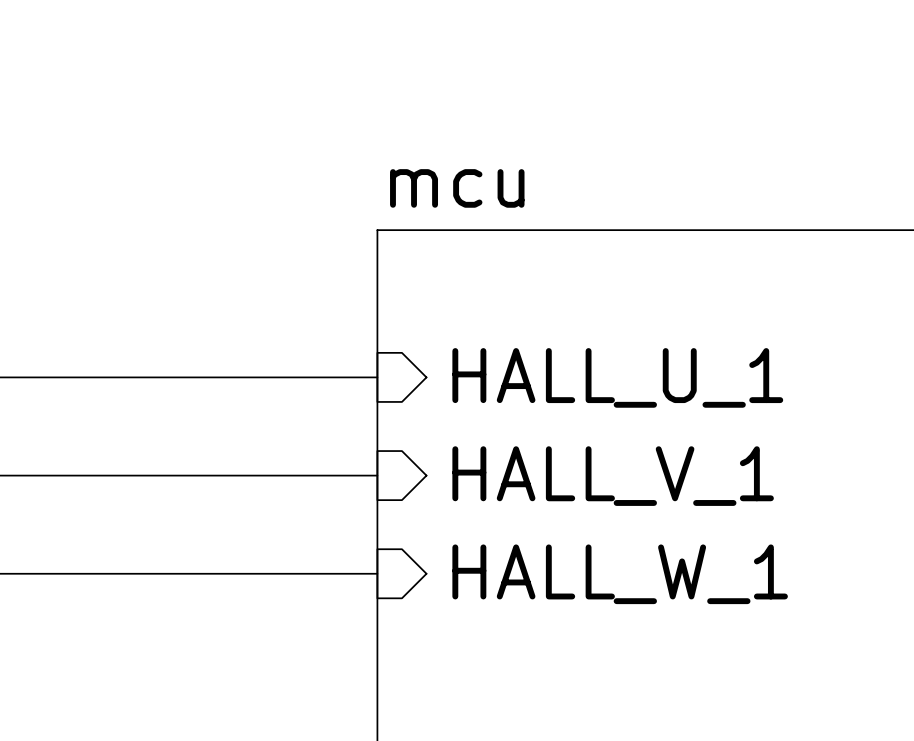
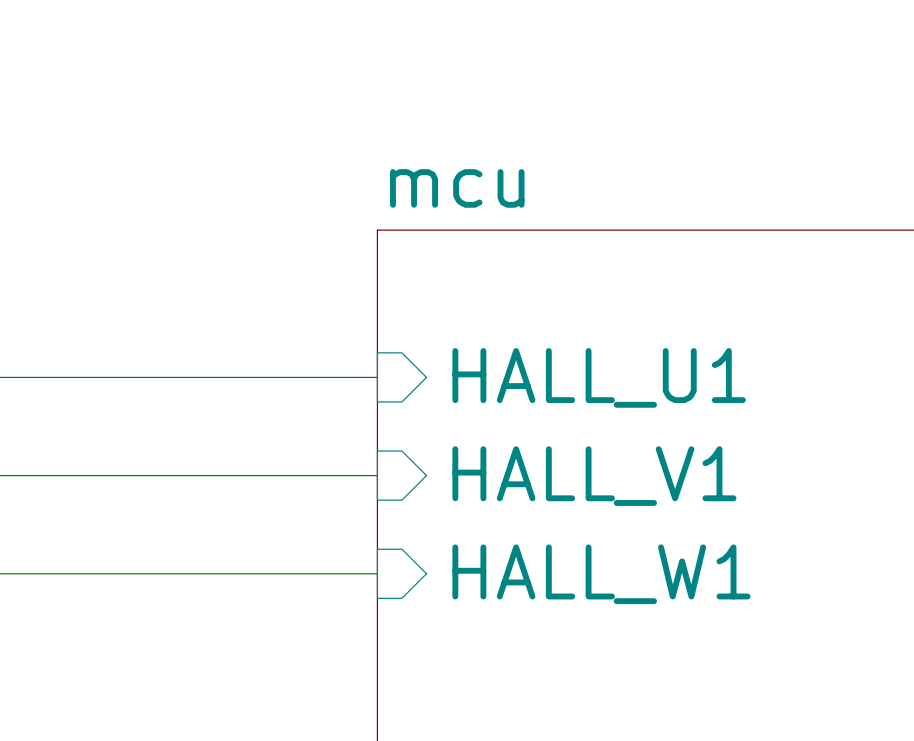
sheet pin: HALL_U_1 (617, 377) -> HALL_U1 (599, 377)
sheet pin: HALL_V_1 (613, 476) -> HALL_V1 (594, 476)
sheet pin: HALL_W_1 (620, 574) -> HALL_W1 (601, 574)

